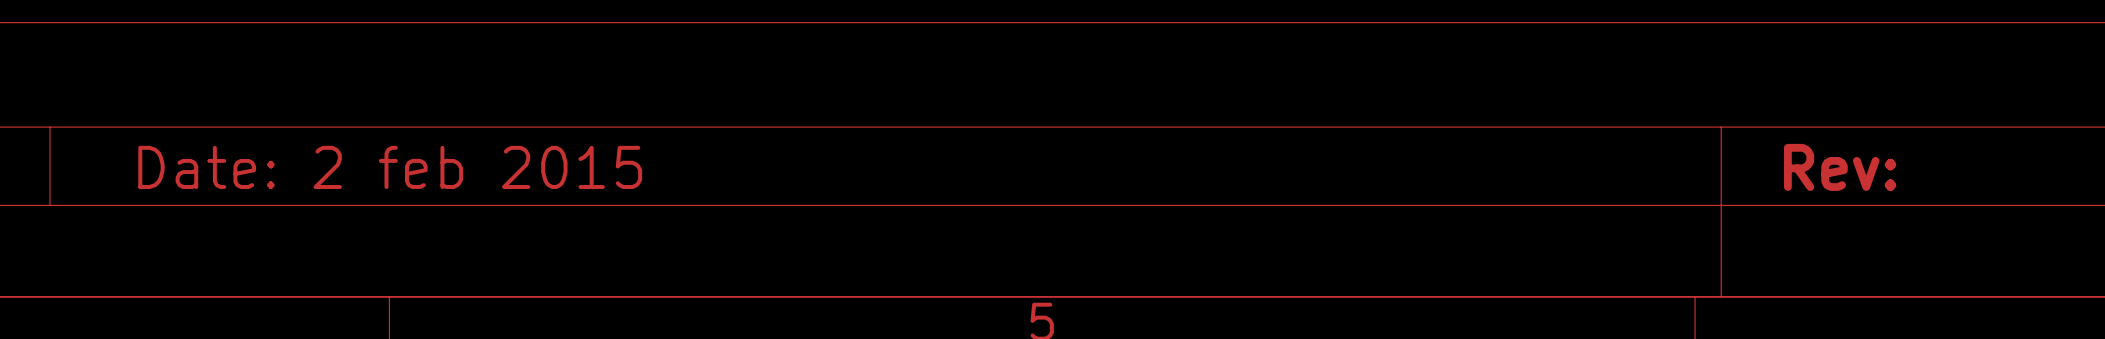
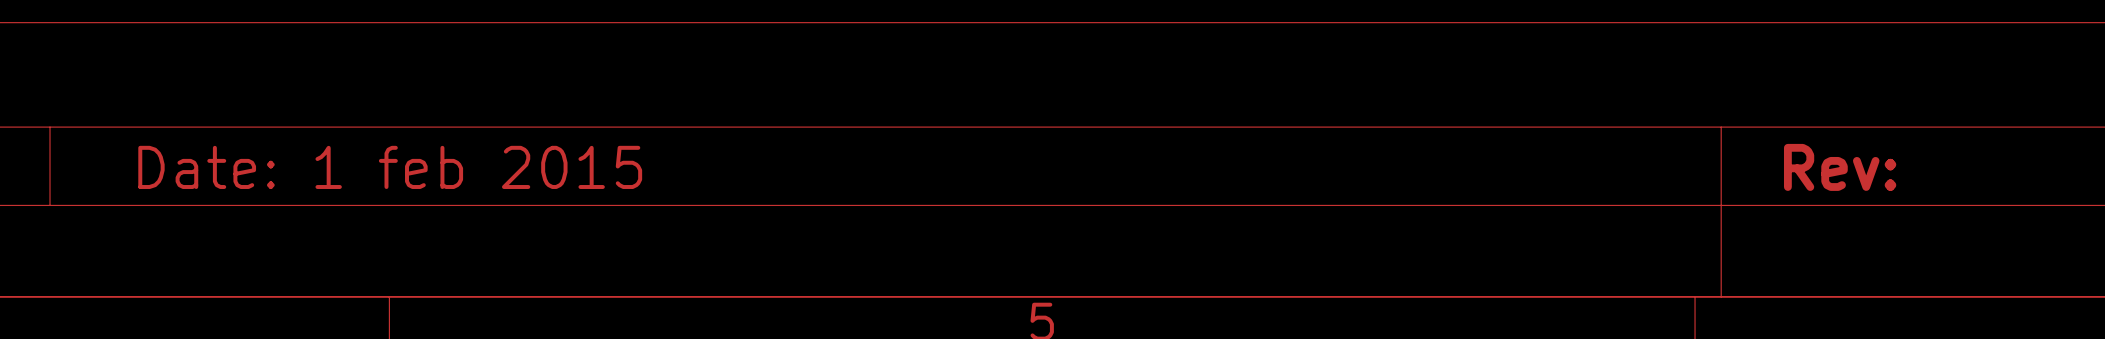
title block: Date: 2 feb 2015 (390, 167) -> Date: 1 feb 2015 (390, 167)

